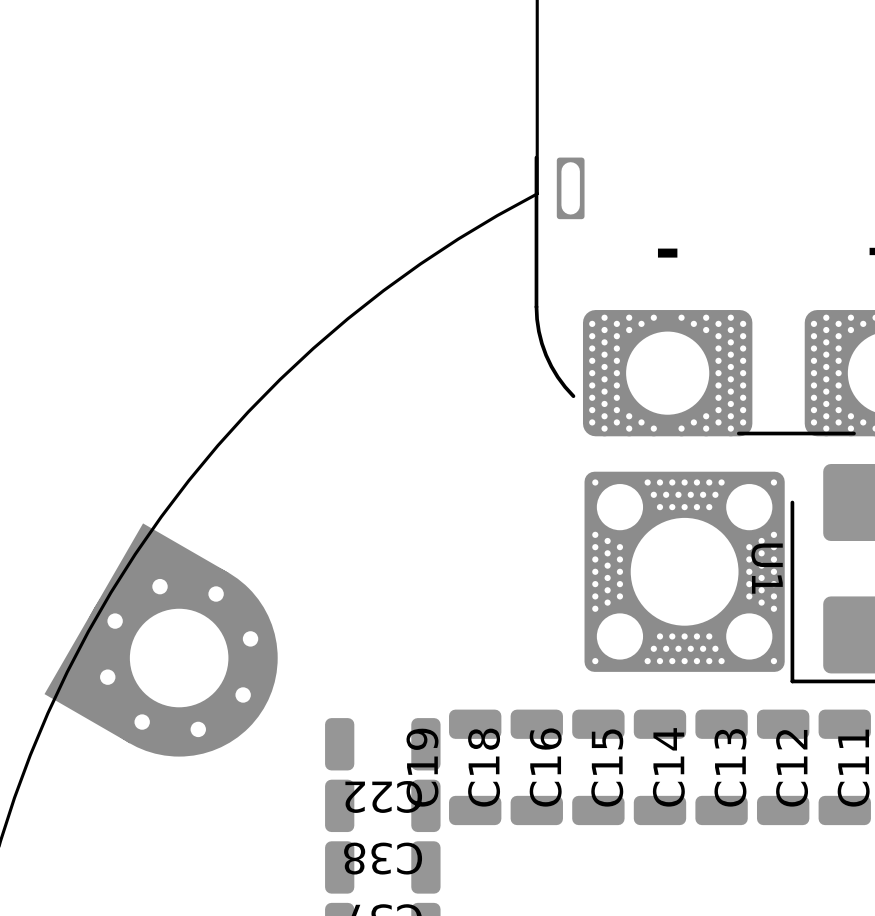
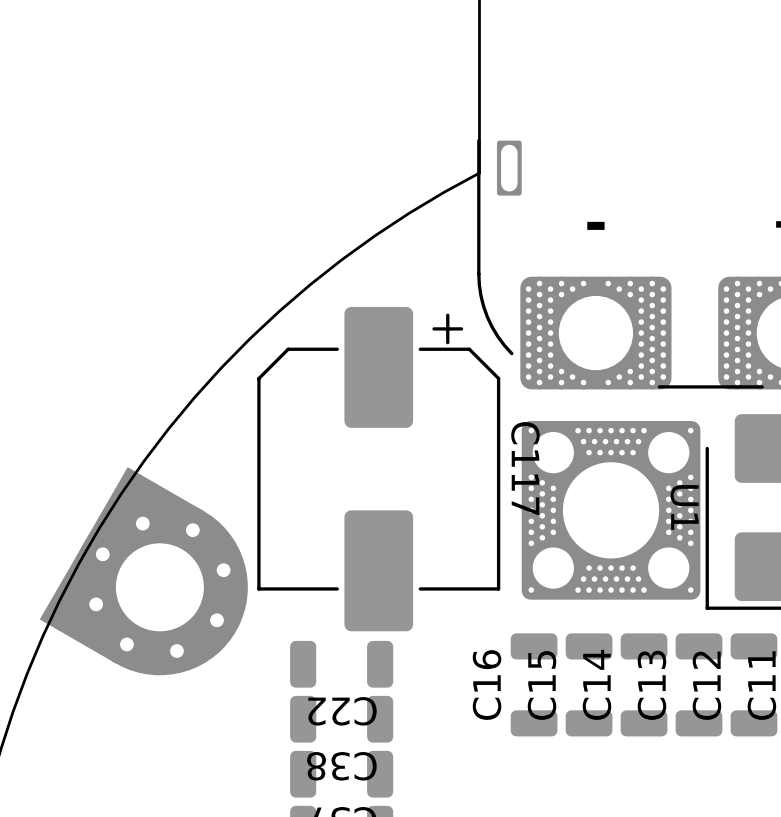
C117: none -> (378, 469)
C19: (475, 767) -> none
C18: (536, 767) -> none

